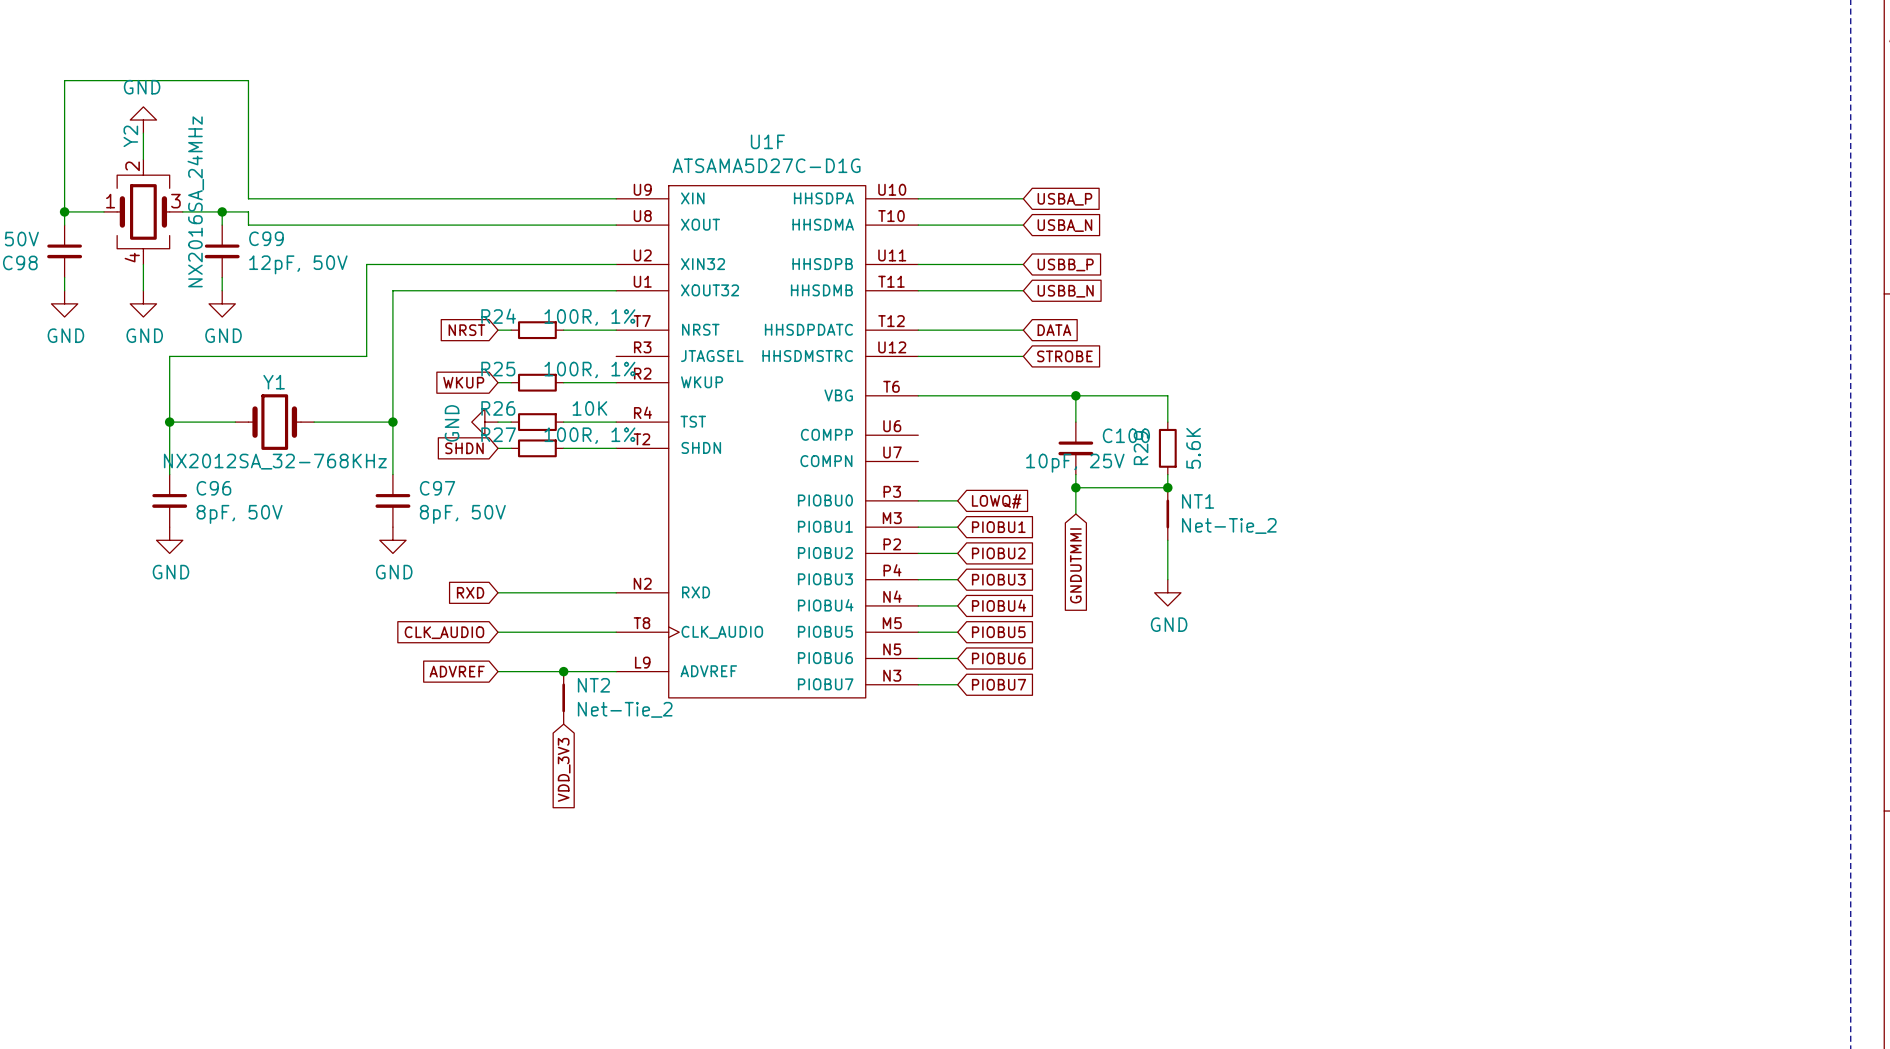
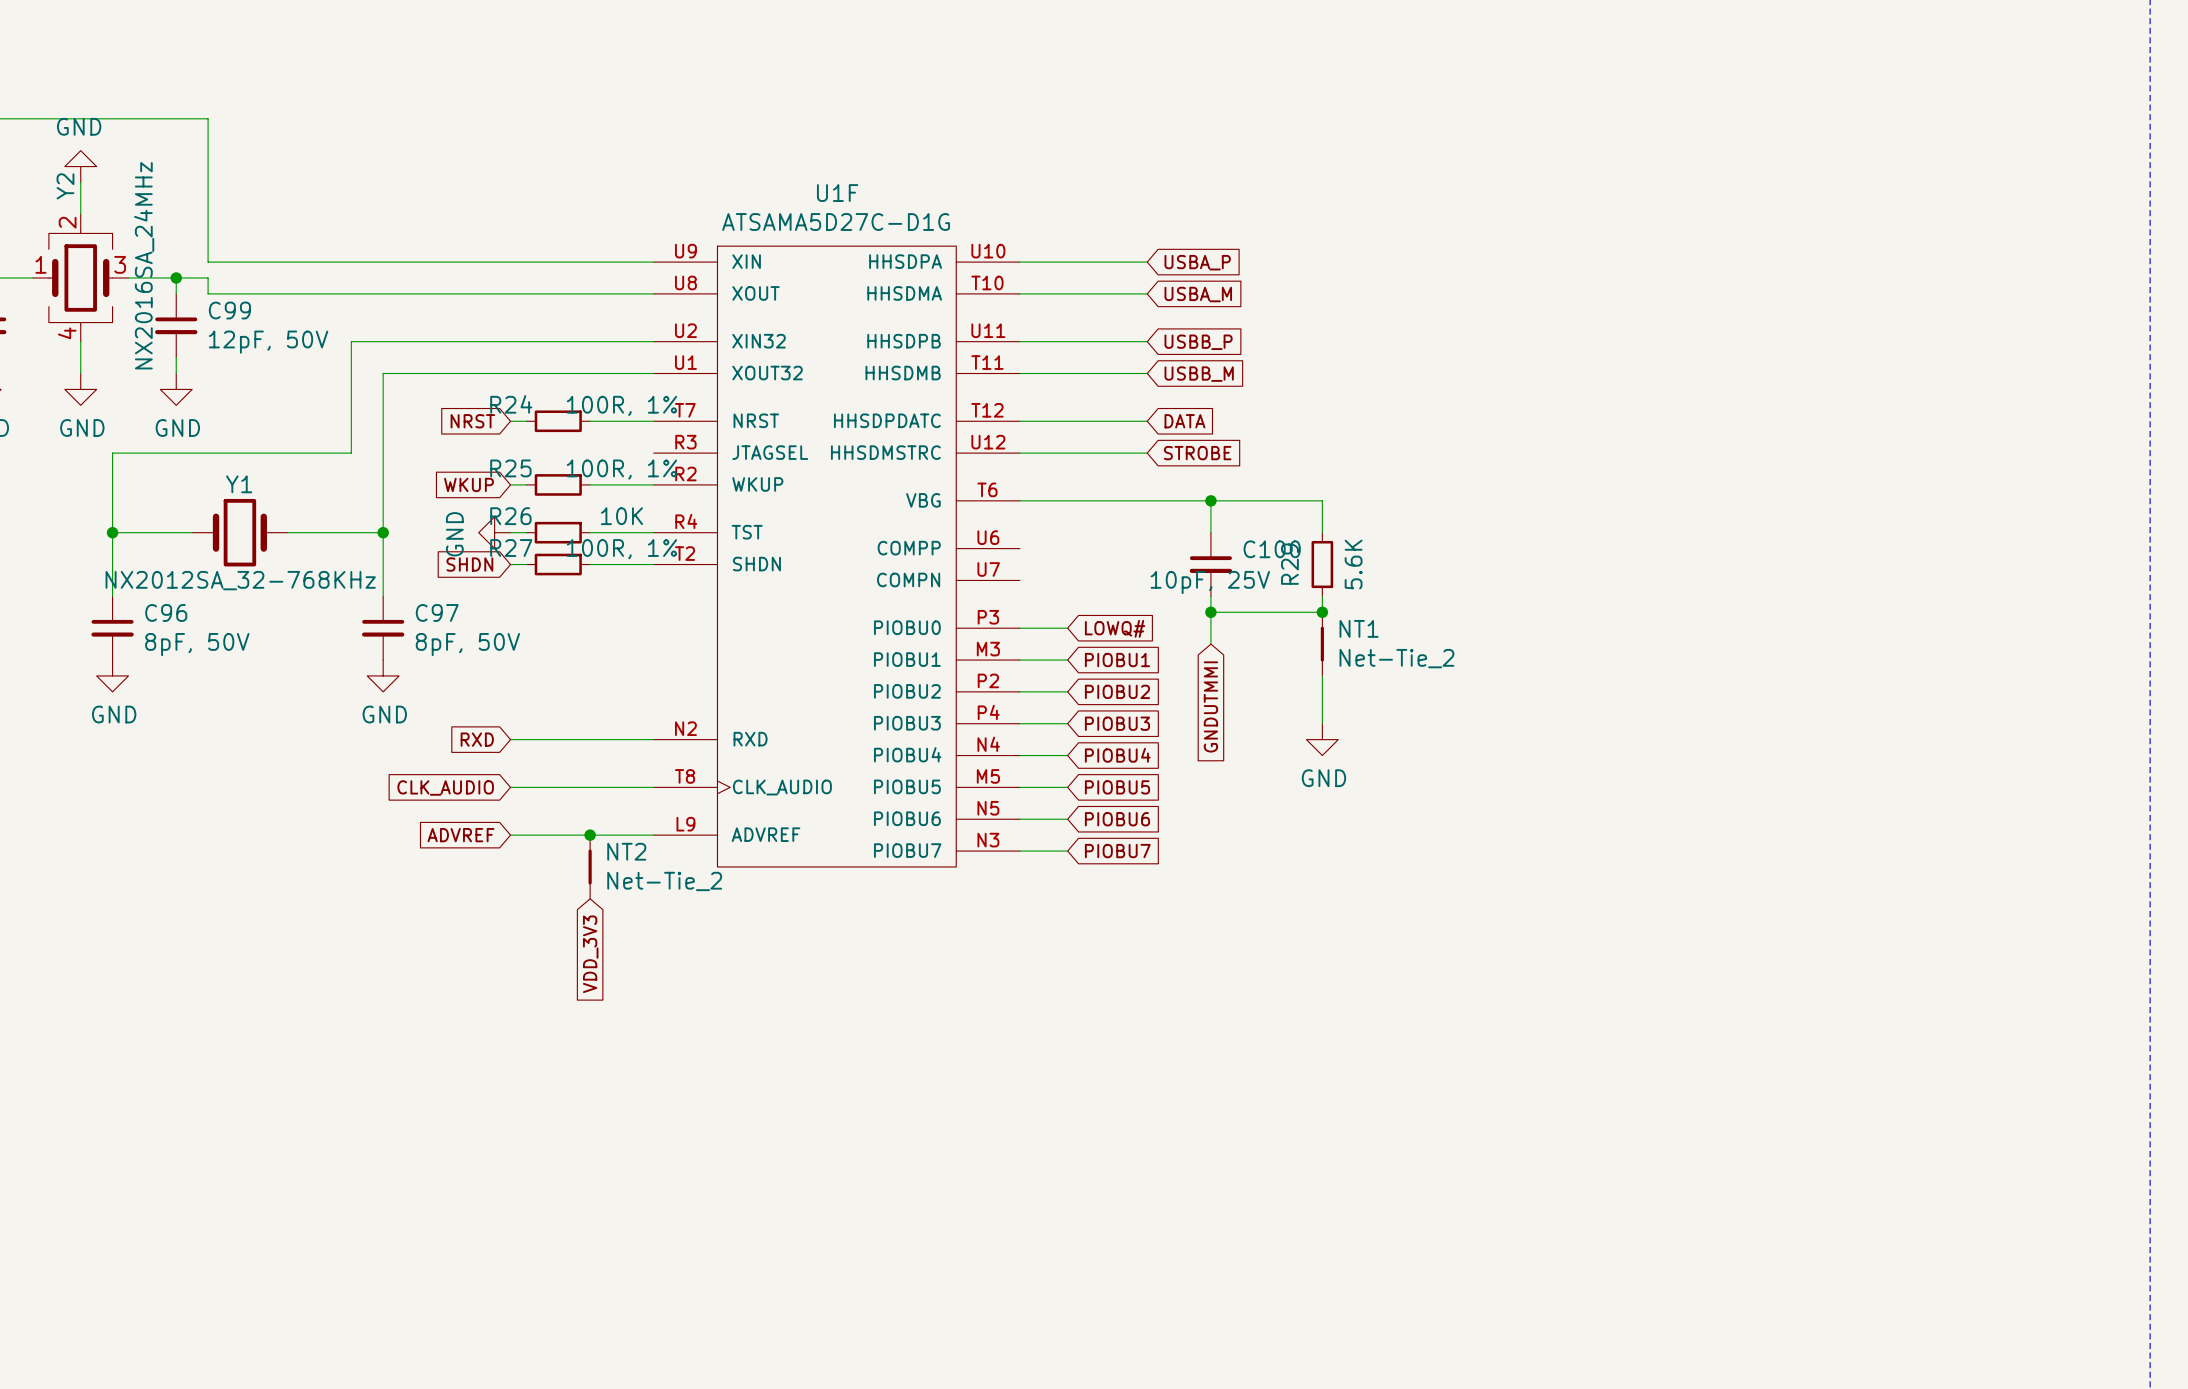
global label: USBA_N (1064, 225) -> USBA_M (1198, 294)
global label: USBB_N (1065, 291) -> USBB_M (1199, 374)

